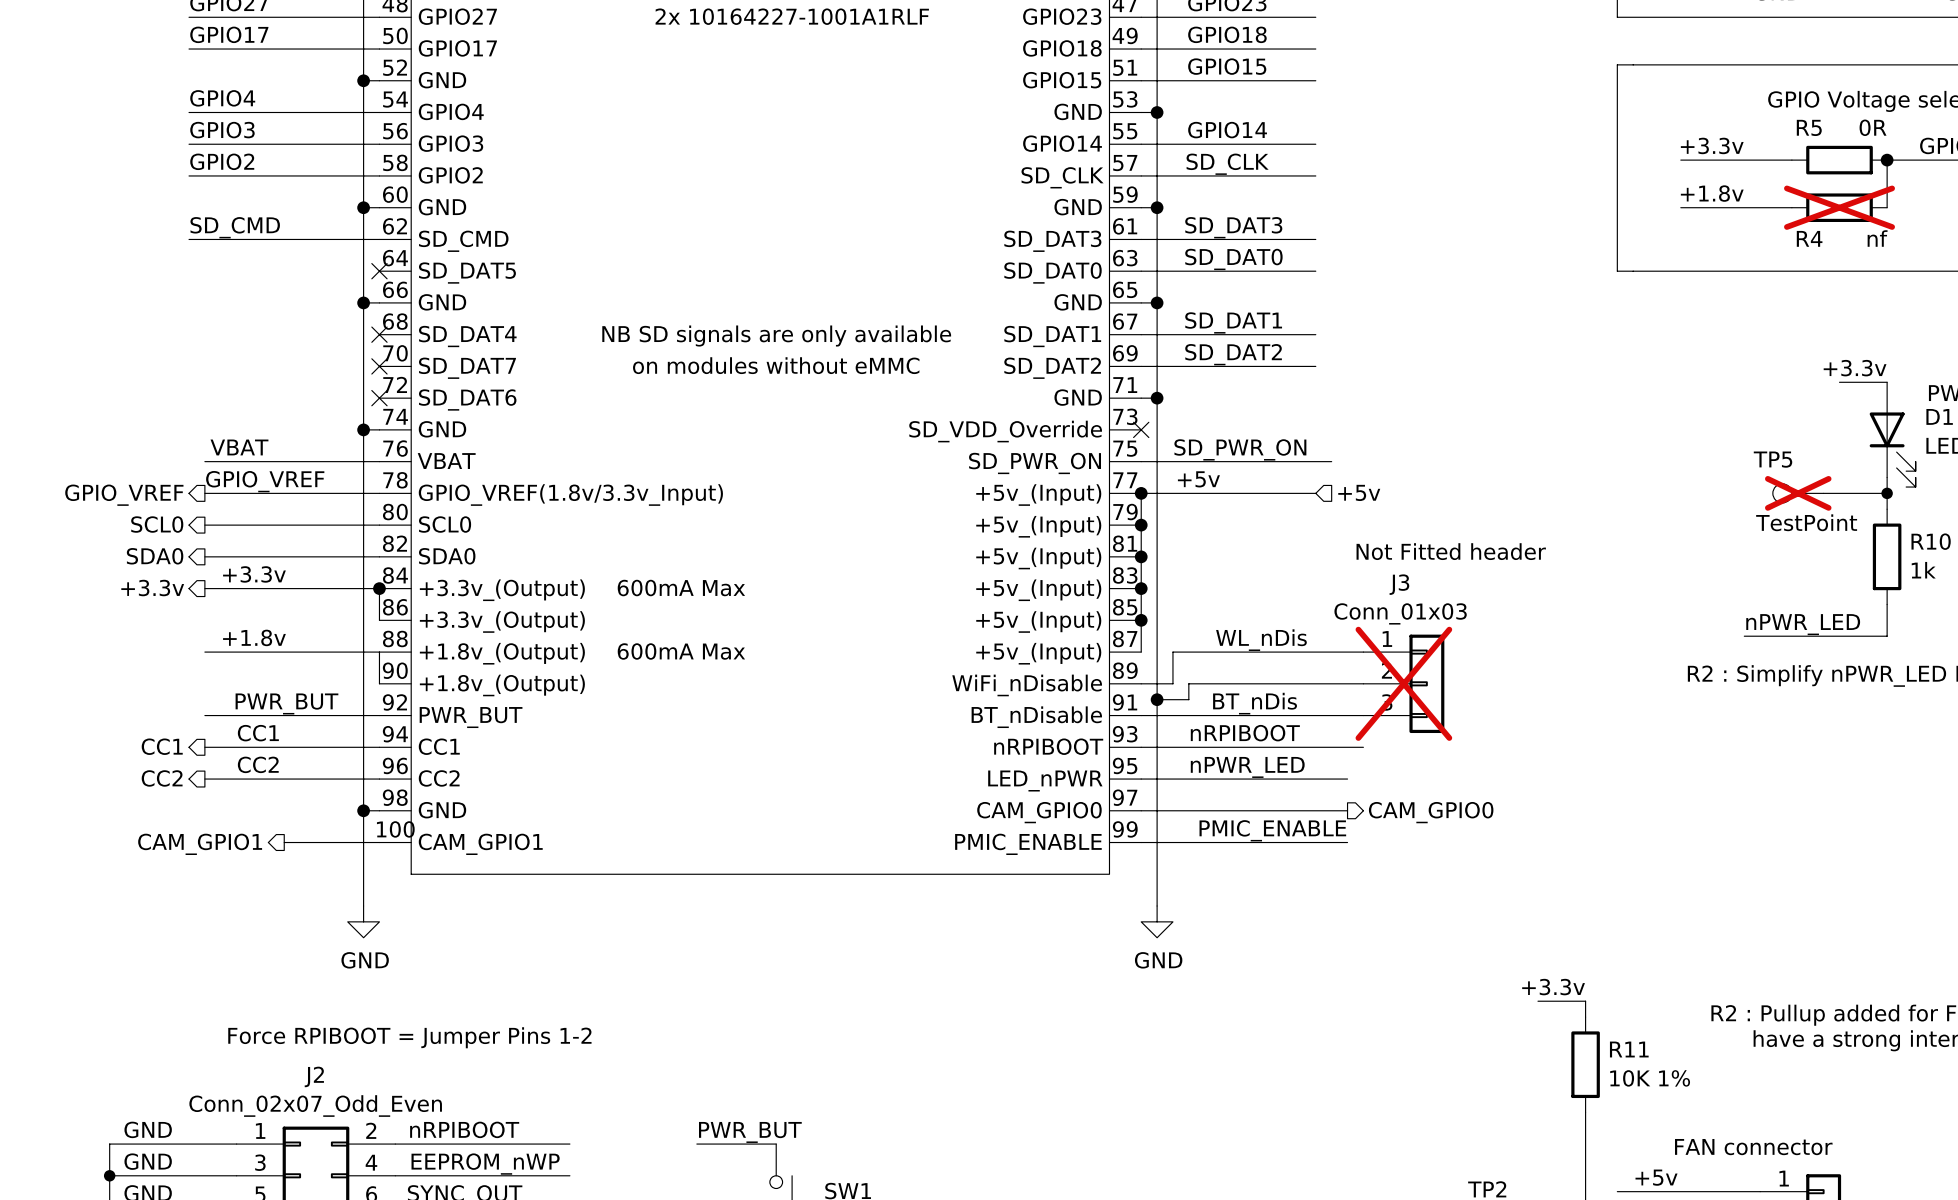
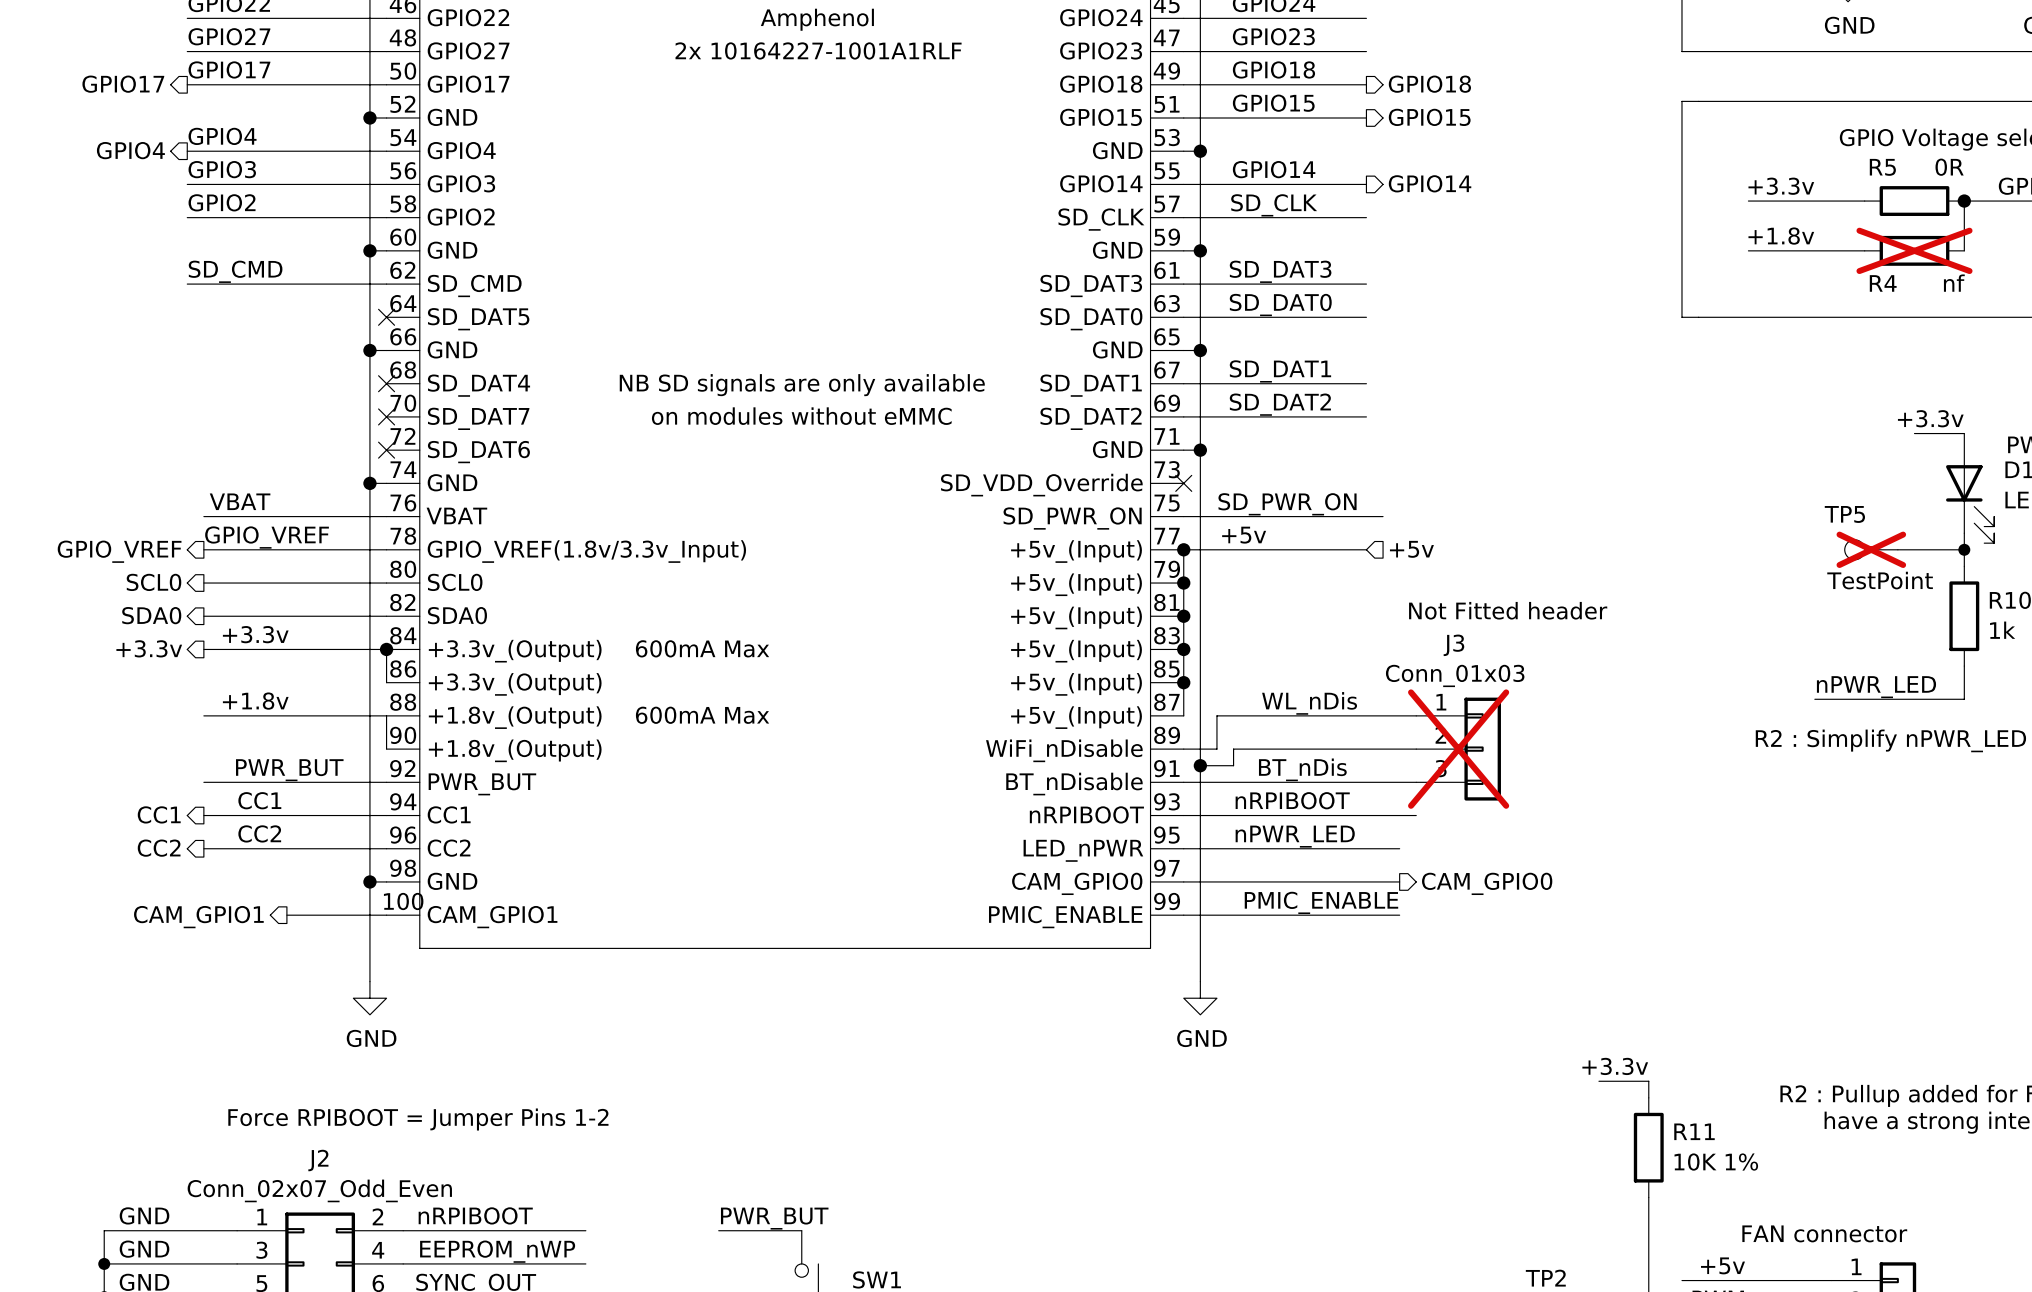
hierarchical label: none -> GPIO17 (123, 84)
hierarchical label: none -> GPIO18 (1429, 84)
hierarchical label: none -> GPIO15 (1429, 117)
hierarchical label: none -> GPIO4 (130, 150)
hierarchical label: none -> GPIO14 (1430, 183)

